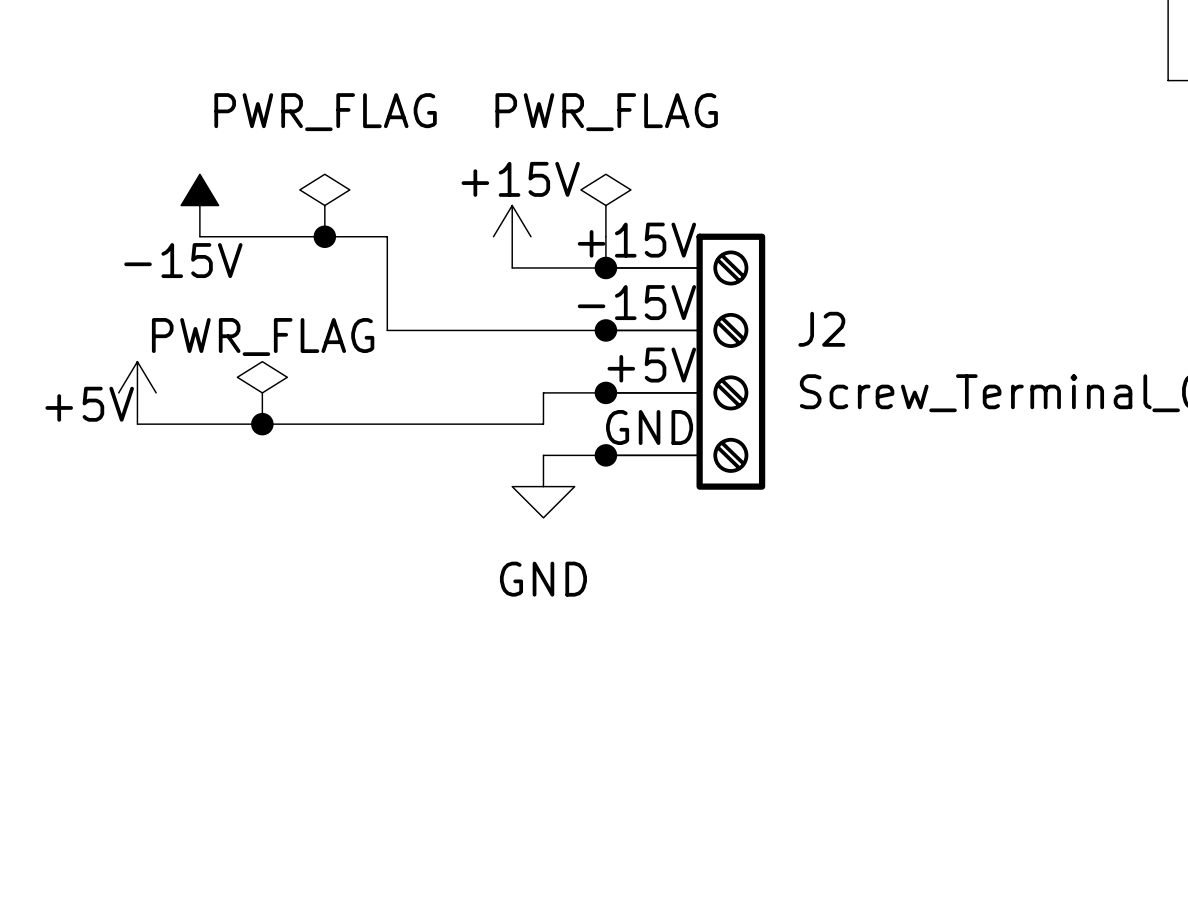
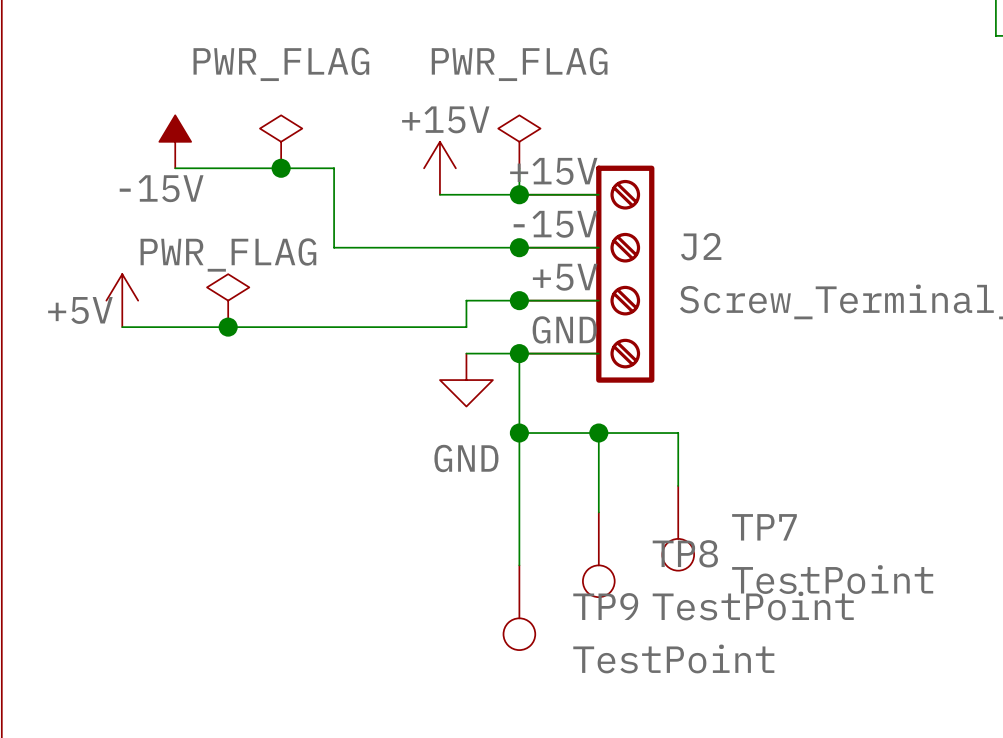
wire: none -> (519, 353) (519, 565)
wire: none -> (519, 433) (678, 433) (678, 485)
junction: none -> (519, 433)
wire: none -> (598, 433) (598, 512)
junction: none -> (598, 433)
TP7: none -> TestPoint (678, 528)
TP8: none -> TestPoint (598, 554)
TP9: none -> TestPoint (519, 607)

